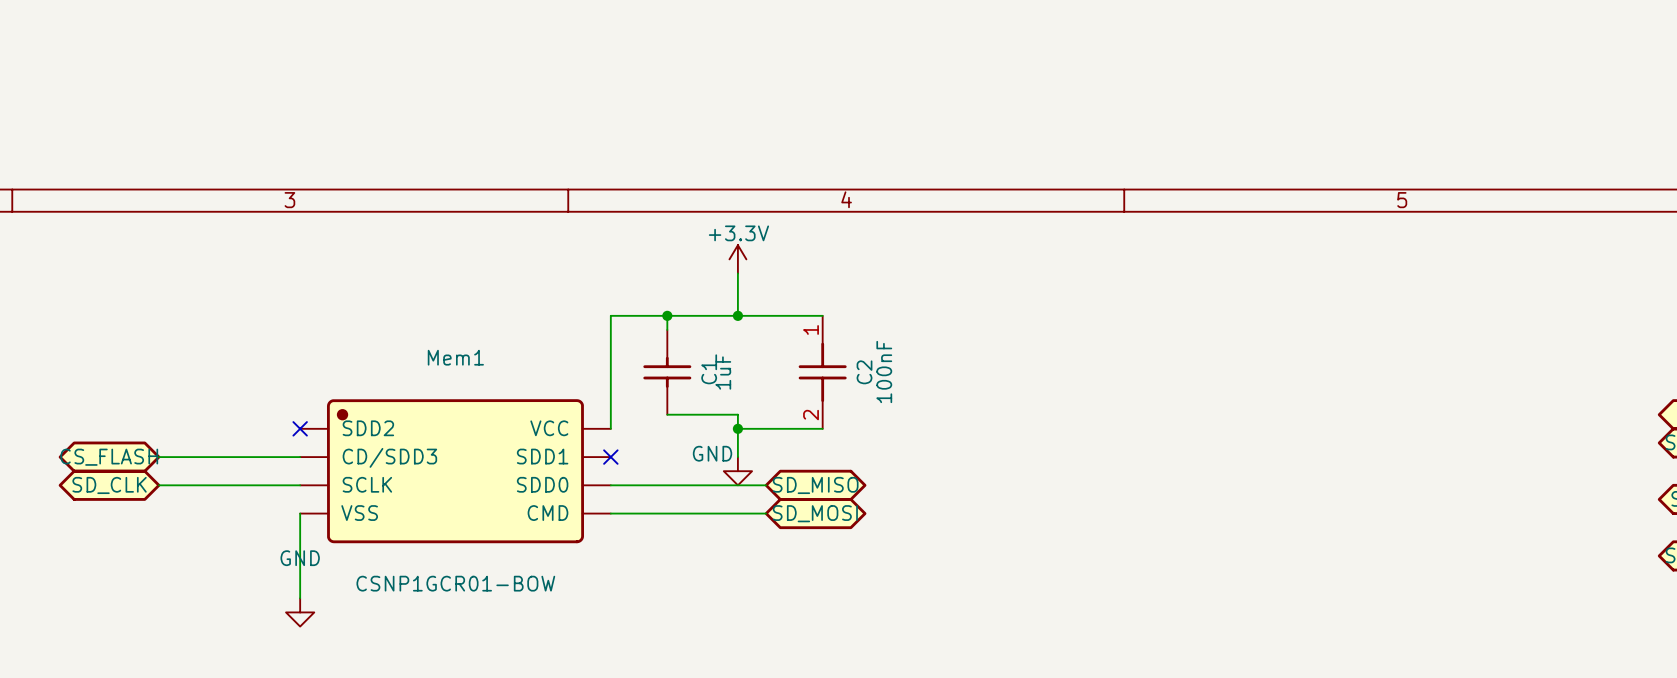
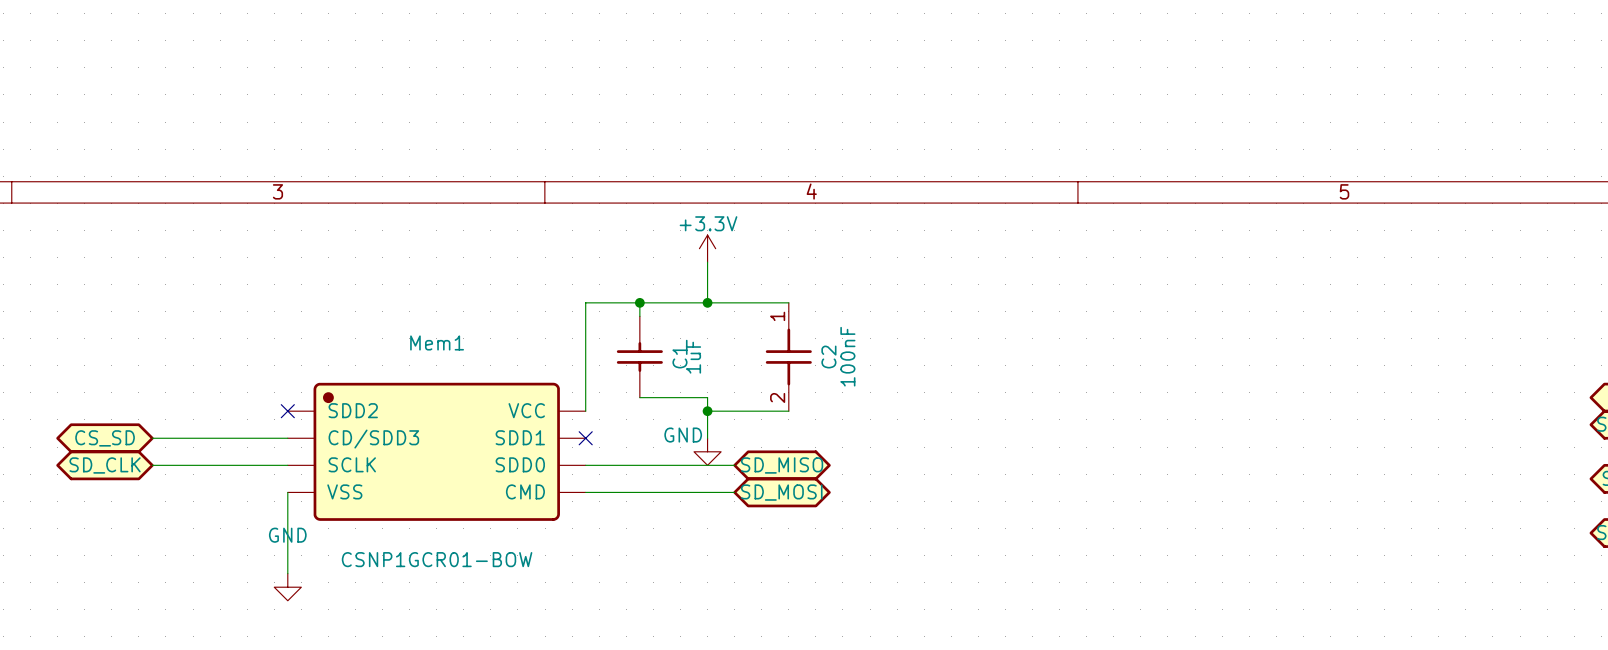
power symbol: CS_FLASH (109, 457) -> CS_SD (105, 438)

